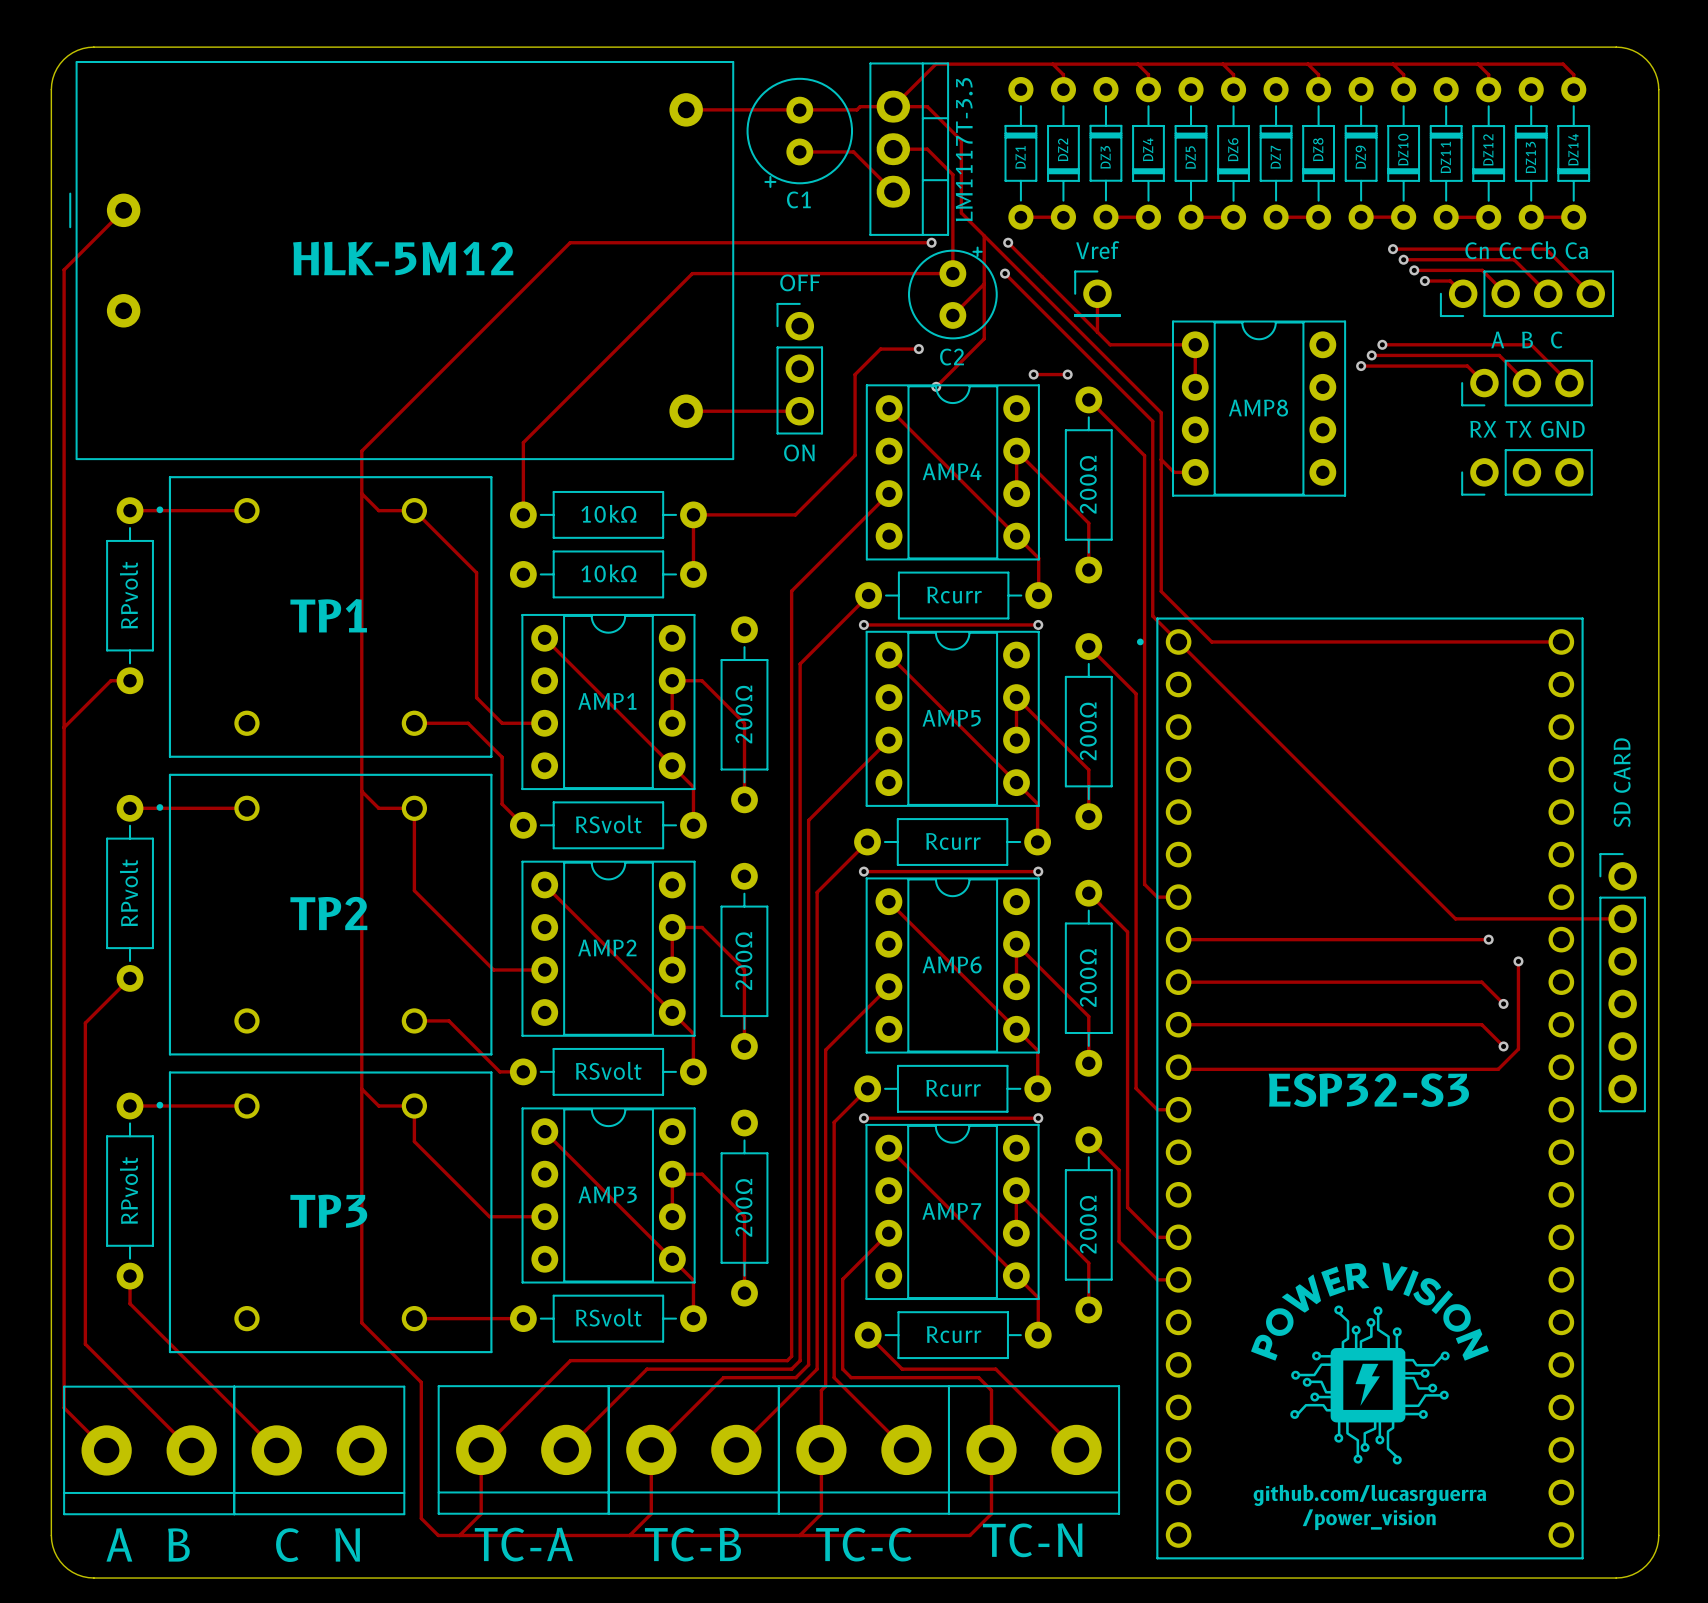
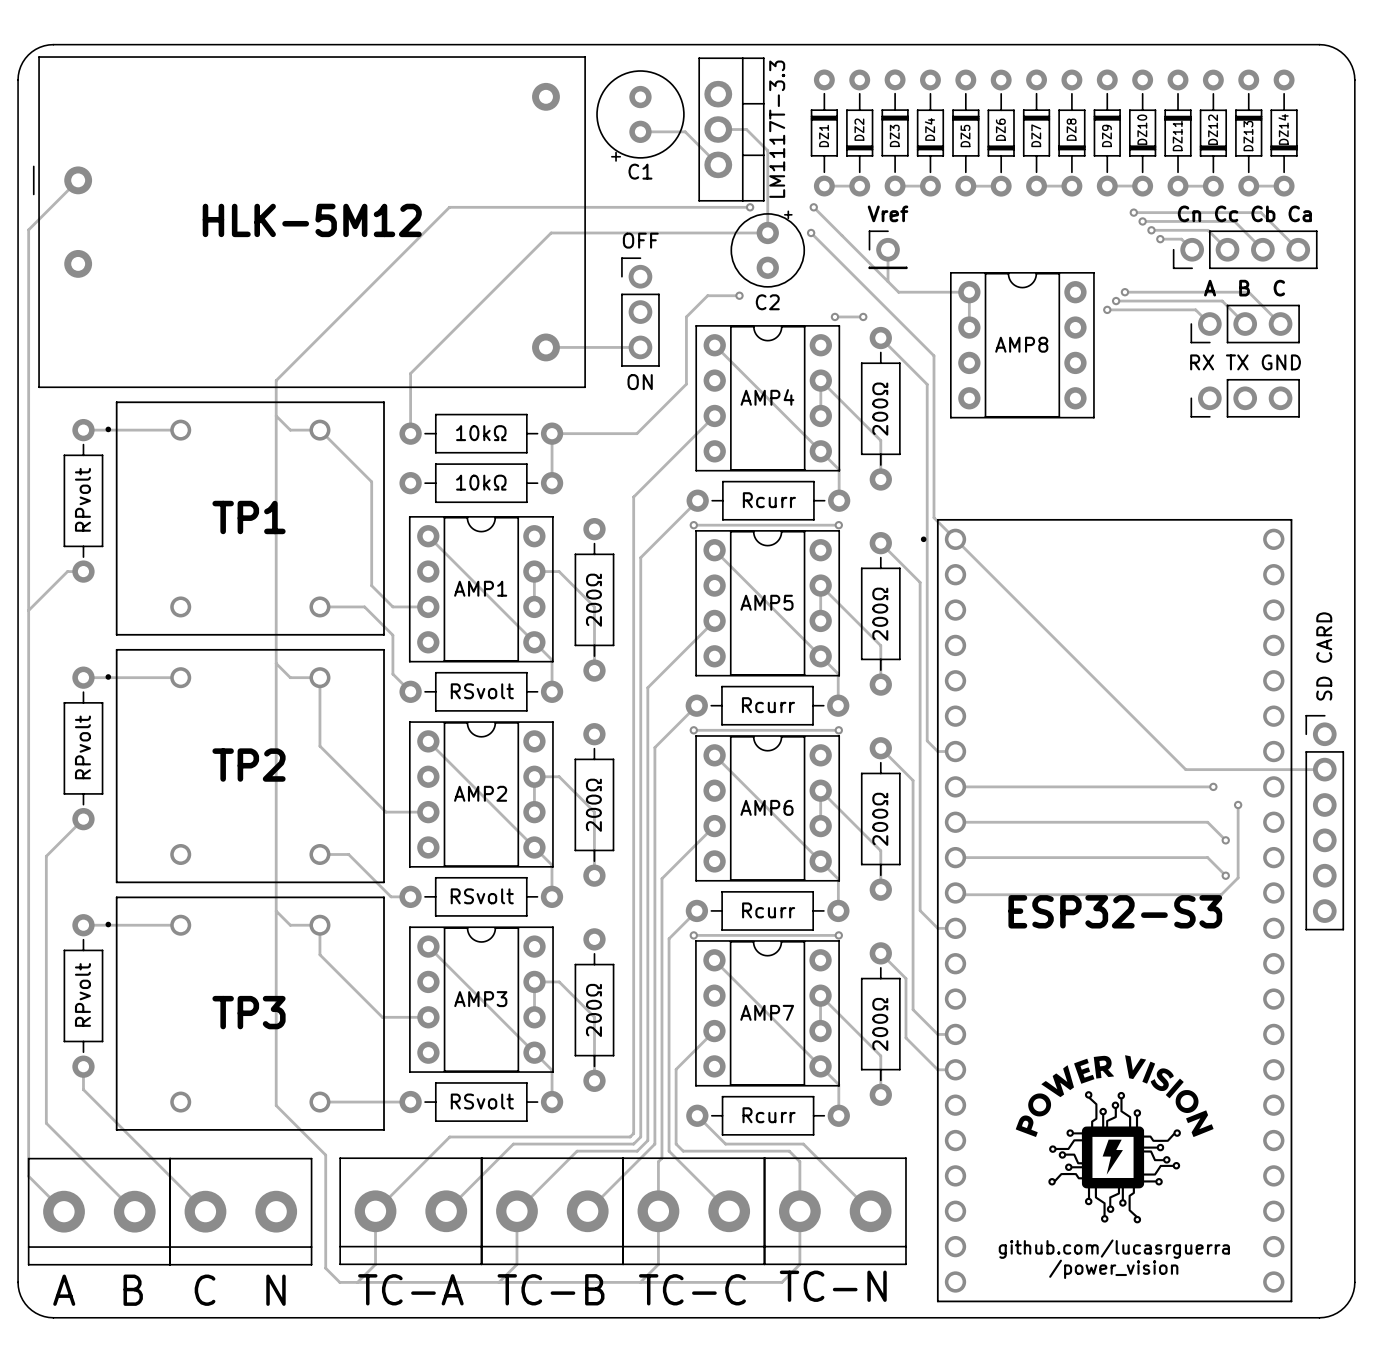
track: (1052, 64) (1063, 74) (1063, 89) -> none
track: (1137, 64) (1148, 74) (1148, 89) -> none
track: (1222, 64) (1233, 74) (1233, 89) -> none
track: (1307, 64) (1318, 74) (1318, 89) -> none
track: (1393, 64) (1403, 74) (1403, 89) -> none
track: (1478, 64) (1488, 74) (1488, 89) -> none
track: (1573, 89) (1573, 74) (1563, 64) (935, 64) (893, 106) -> none
track: (686, 109) (856, 109) (860, 106) (927, 106) (961, 140) (961, 212) (1161, 412) (1161, 591) (1211, 641) (1561, 641) -> none
track: (984, 235) (984, 338) (936, 386) -> none
track: (984, 284) (952, 315) -> none
via: (936, 386) -> none
track: (1161, 459) (1174, 472) (1195, 472) -> none

